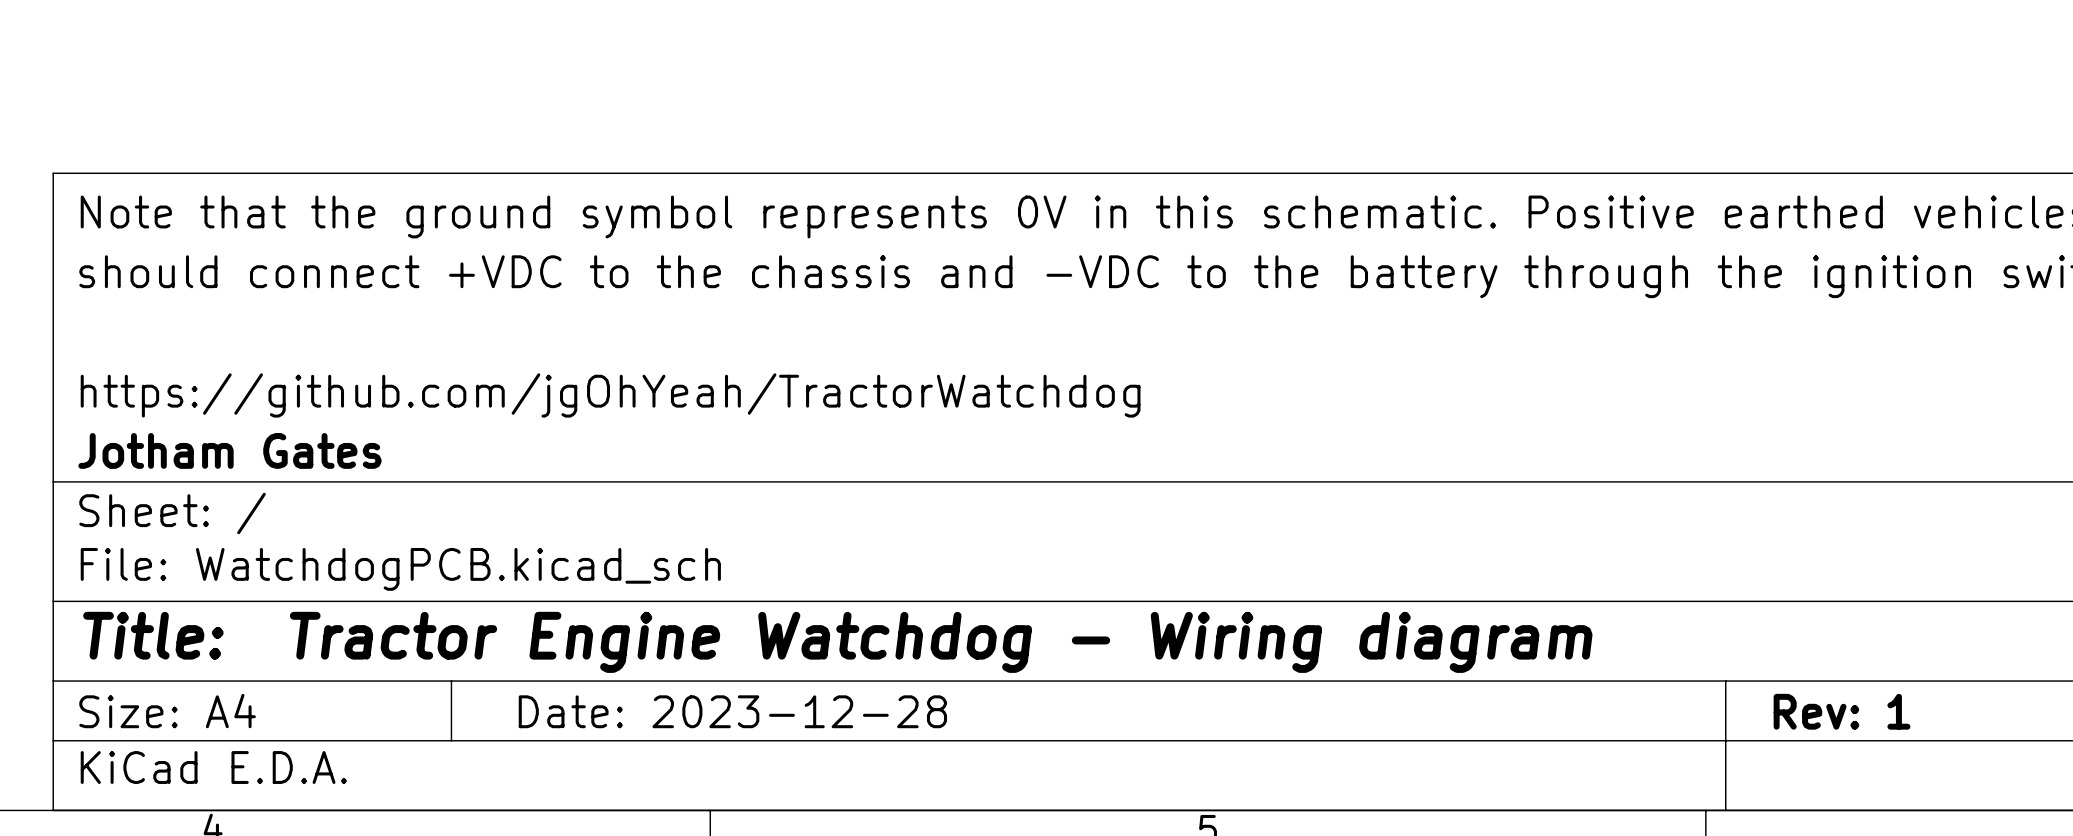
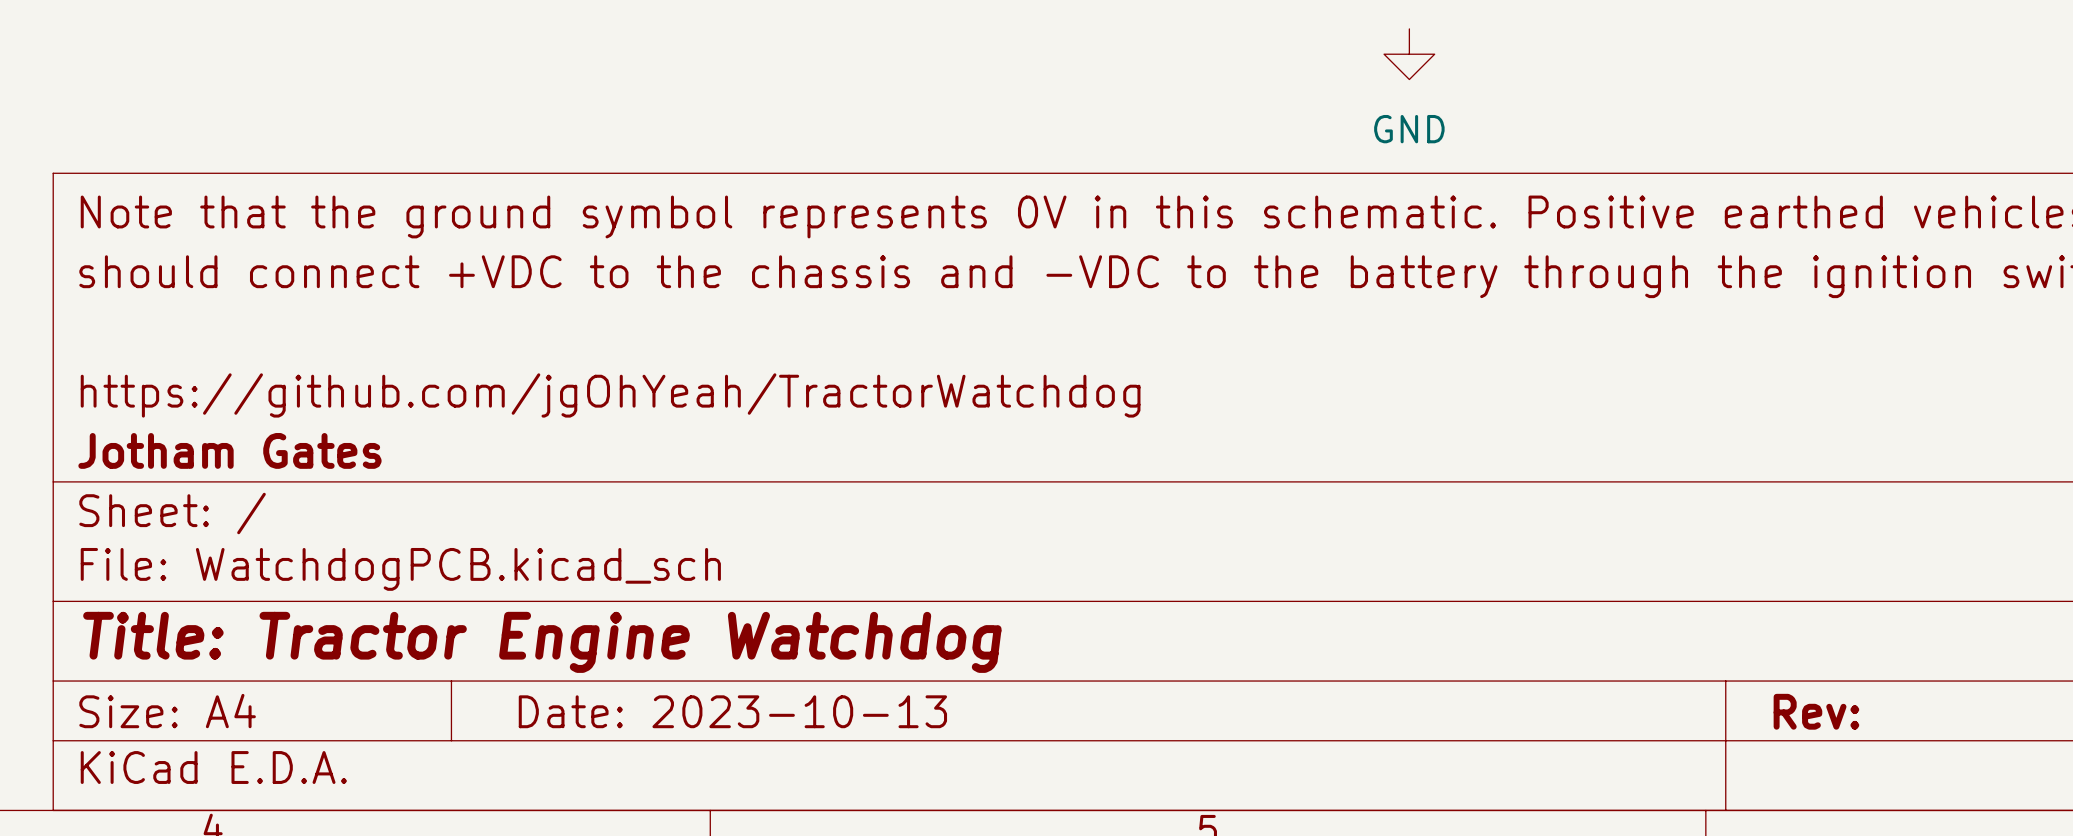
power symbol: none -> GND (1409, 54)
title block: Title: Tractor Engine Watchdog - Wiring diagram (837, 642) -> Title: Tractor Engine Watchdog (542, 642)
title block: Date: 2023-12-28 (732, 711) -> Date: 2023-10-13 (732, 711)
title block: Rev: 1 (1842, 711) -> Rev: (1816, 711)

